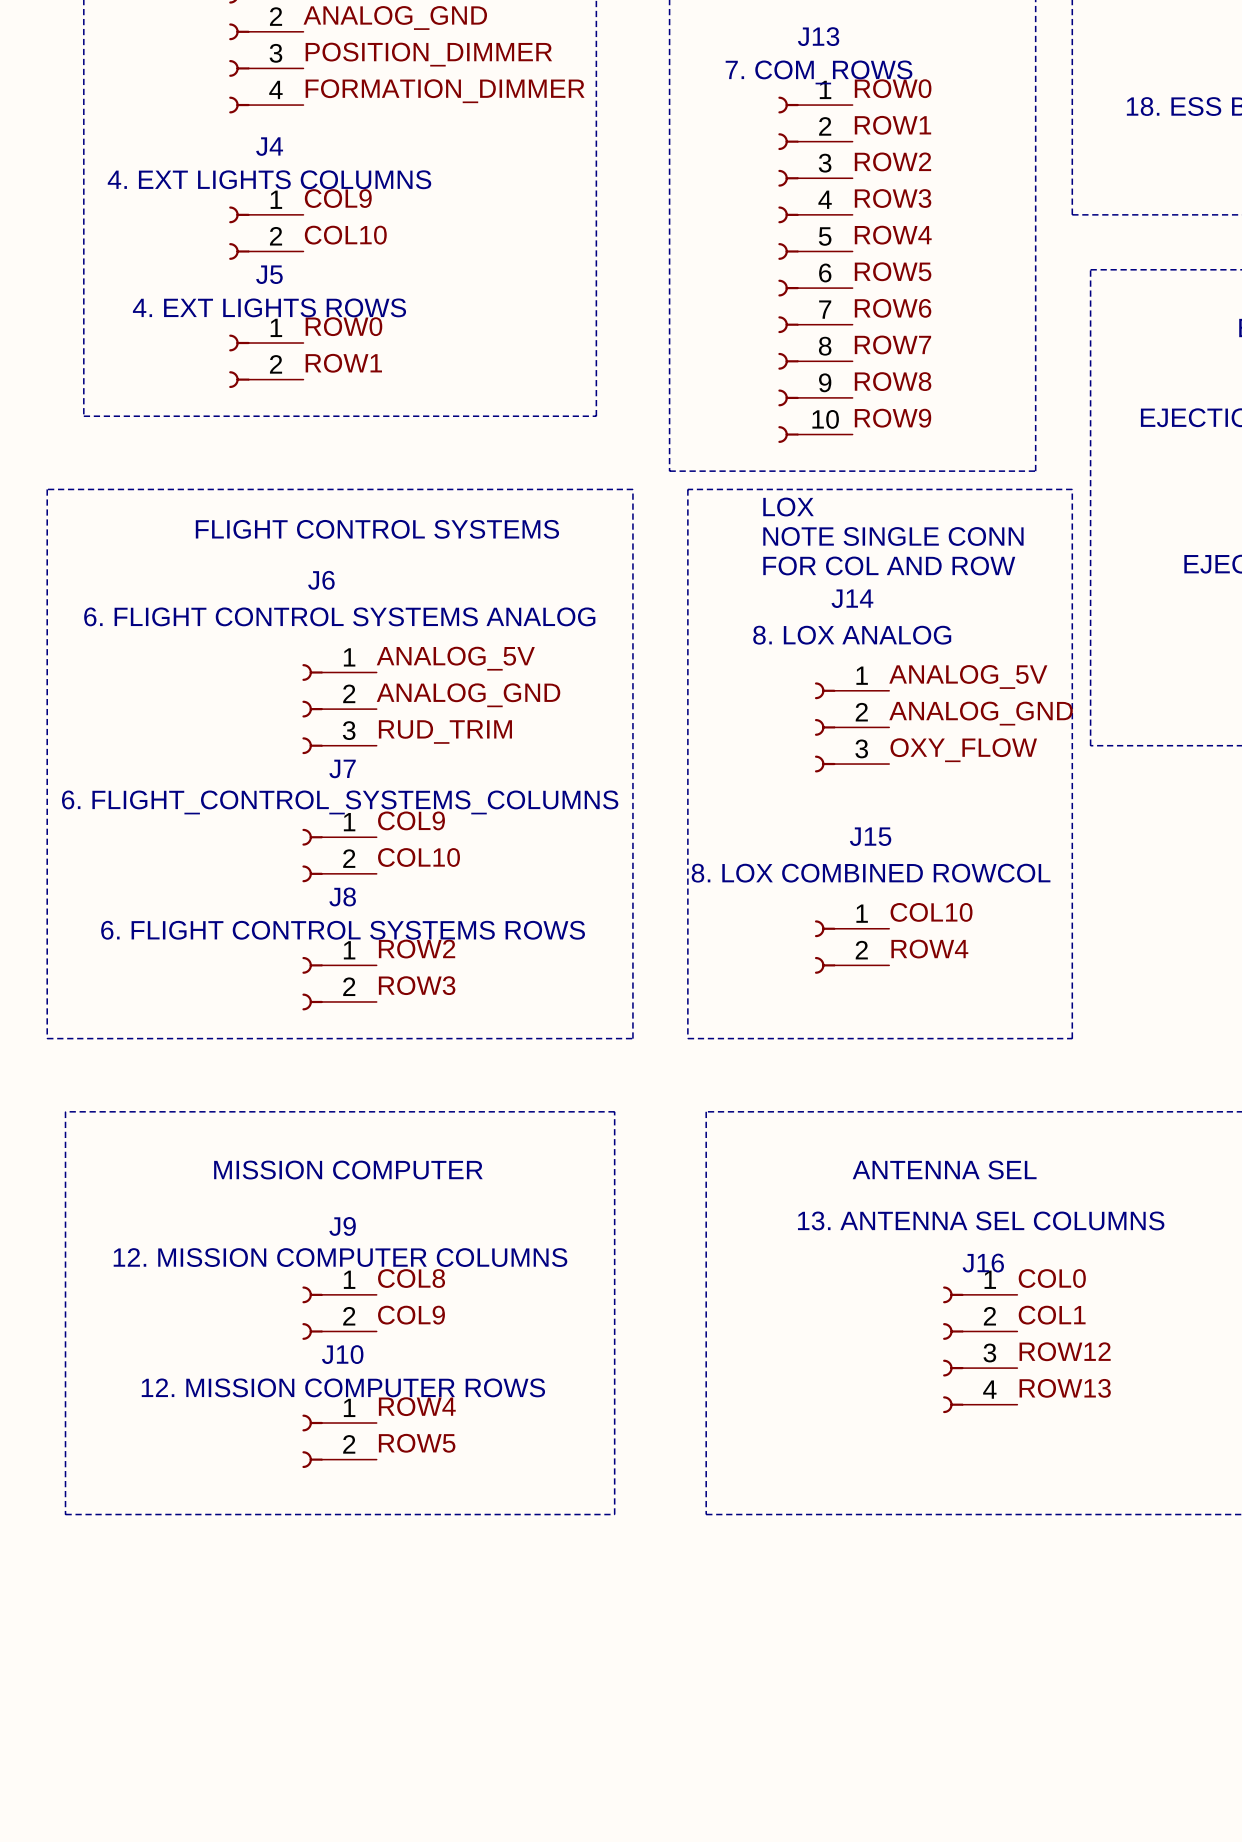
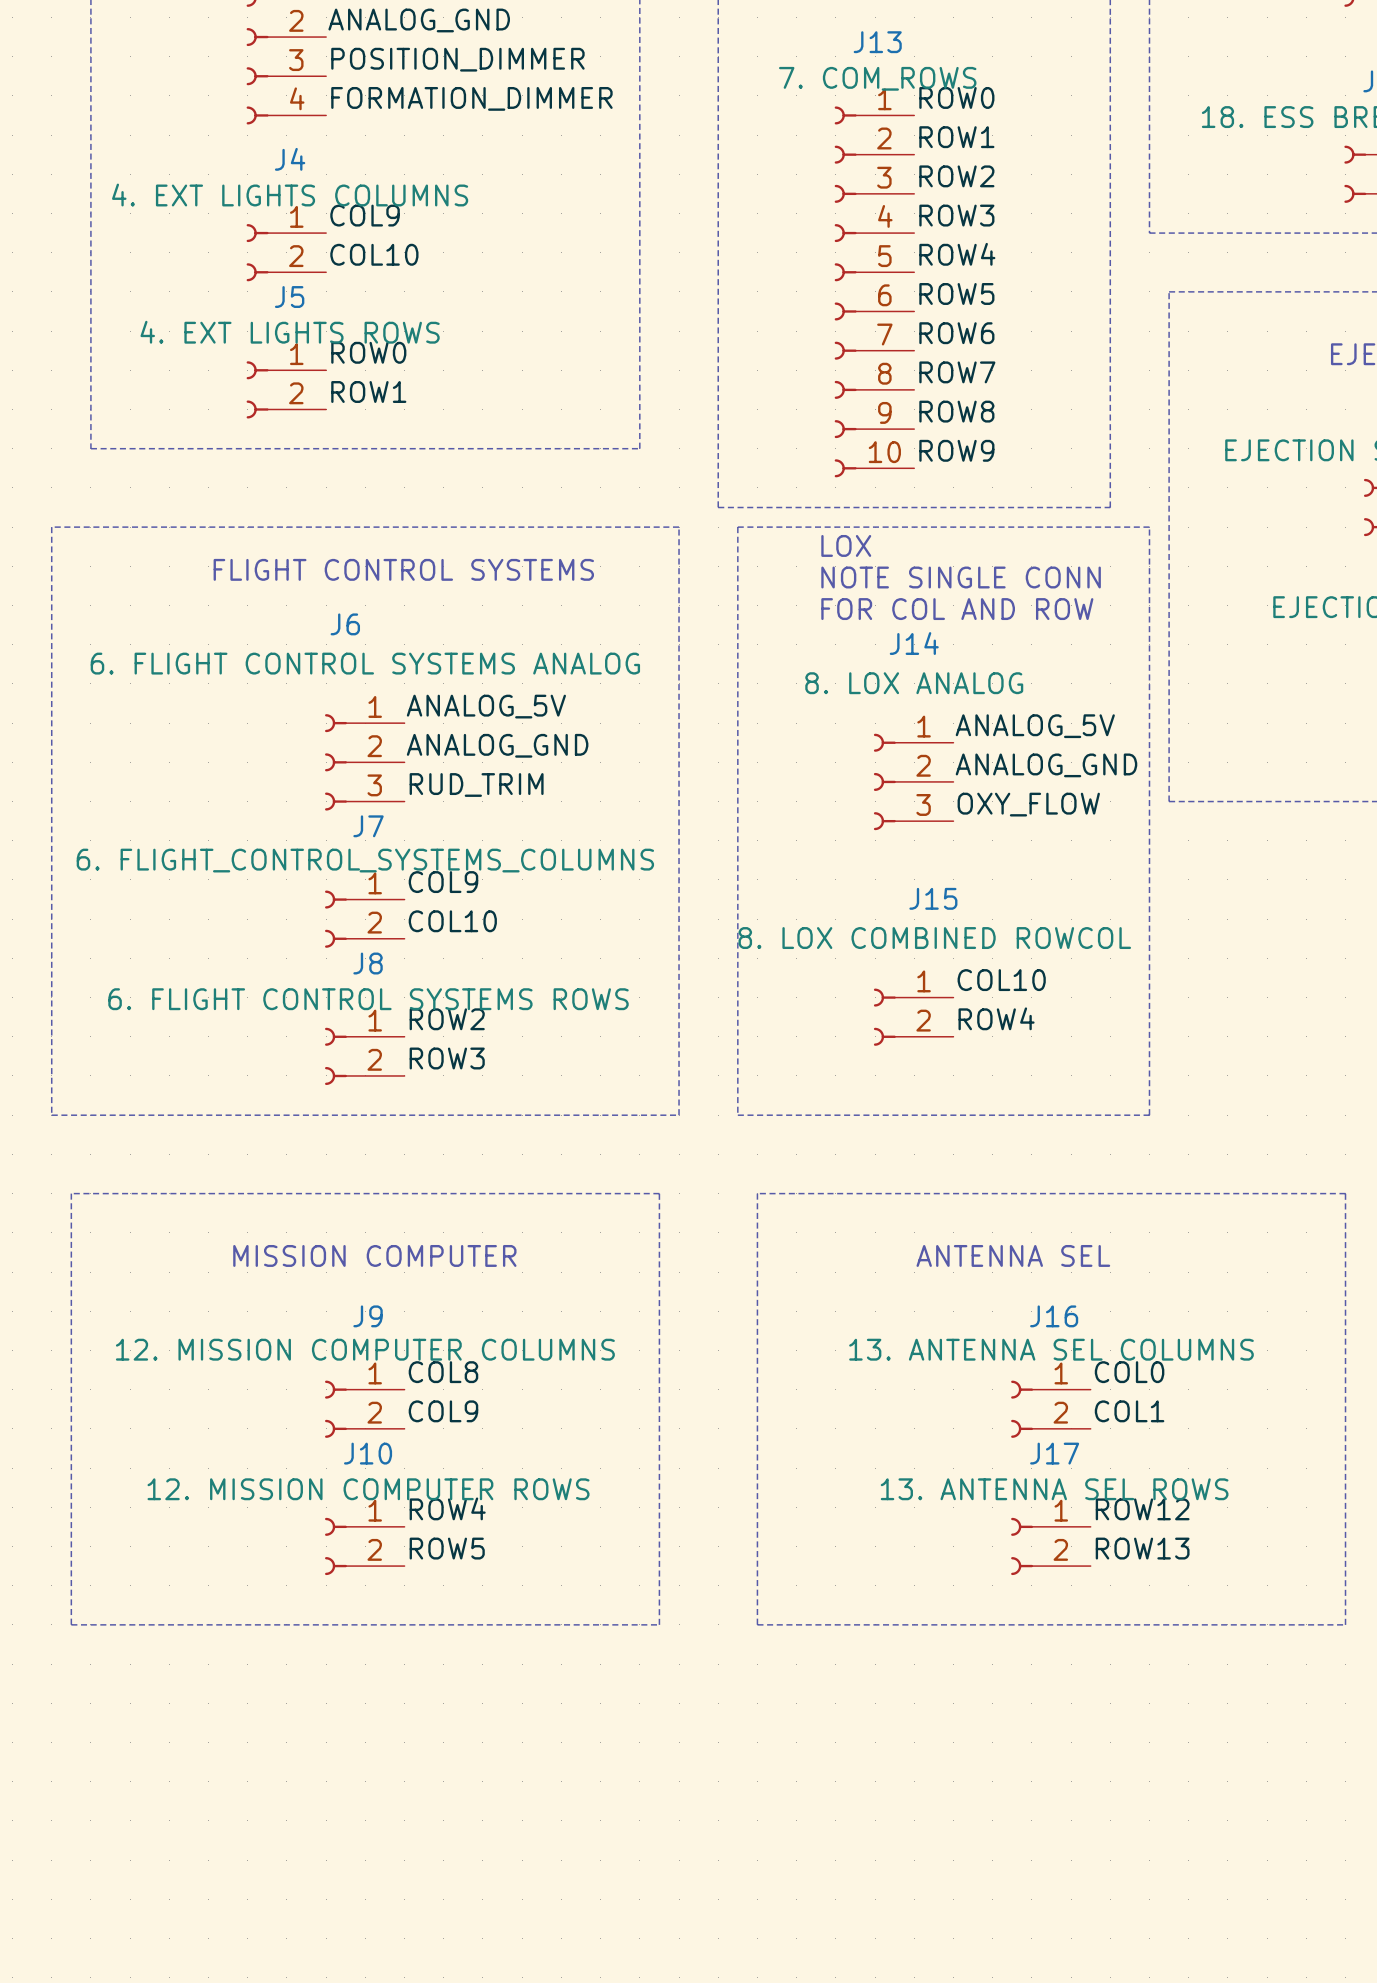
J16 value position: 13. ANTENNA SEL COLUMNS (981, 1220) -> 13. ANTENNA SEL COLUMNS (1051, 1349)
J16 symbol: [943, 1286, 1018, 1414] -> [1011, 1380, 1091, 1438]
label position: ROW12 (1065, 1351) -> ROW12 (1142, 1509)
label position: ROW13 (1065, 1388) -> ROW13 (1142, 1548)
J17: none -> 13. ANTENNA SEL ROWS (1050, 1546)

